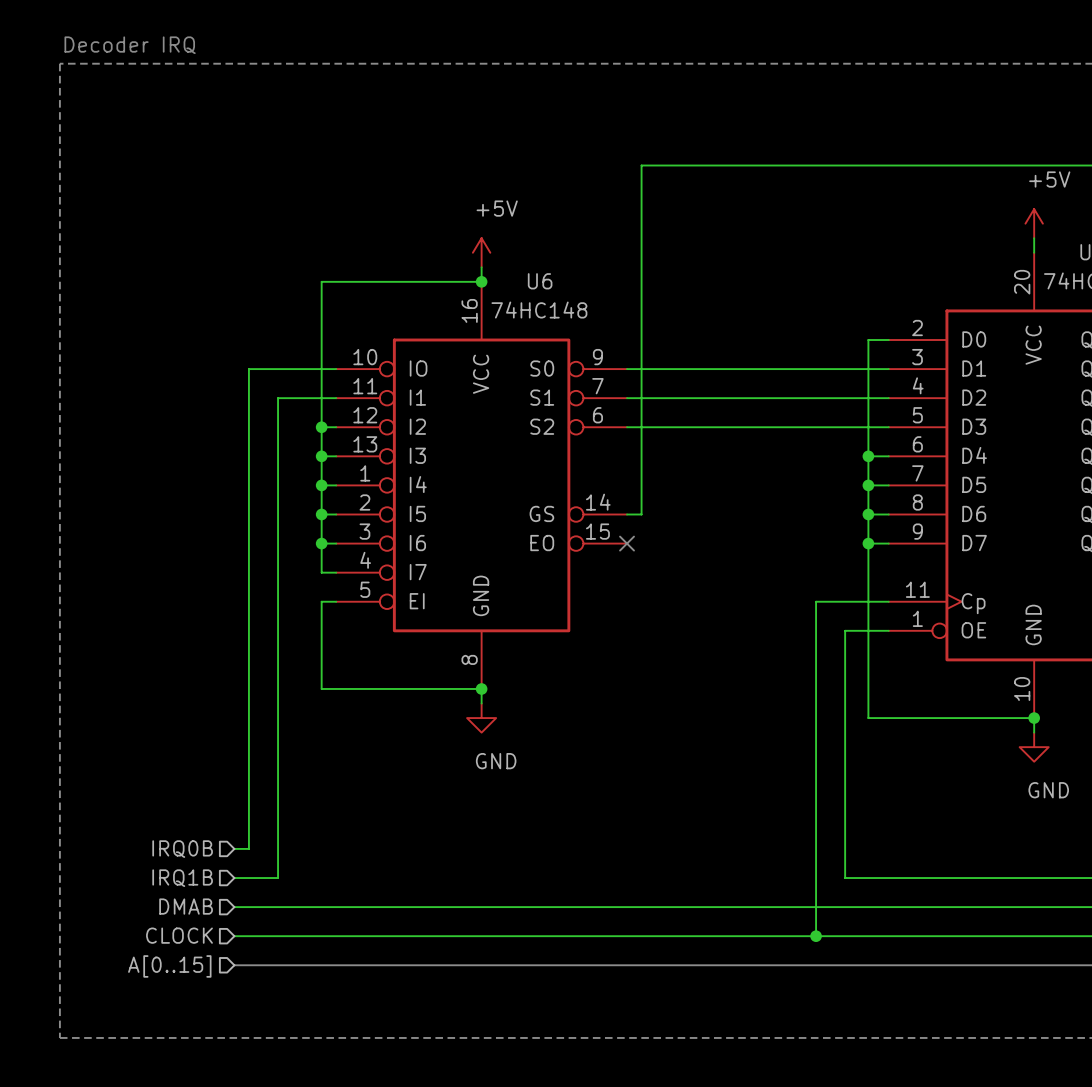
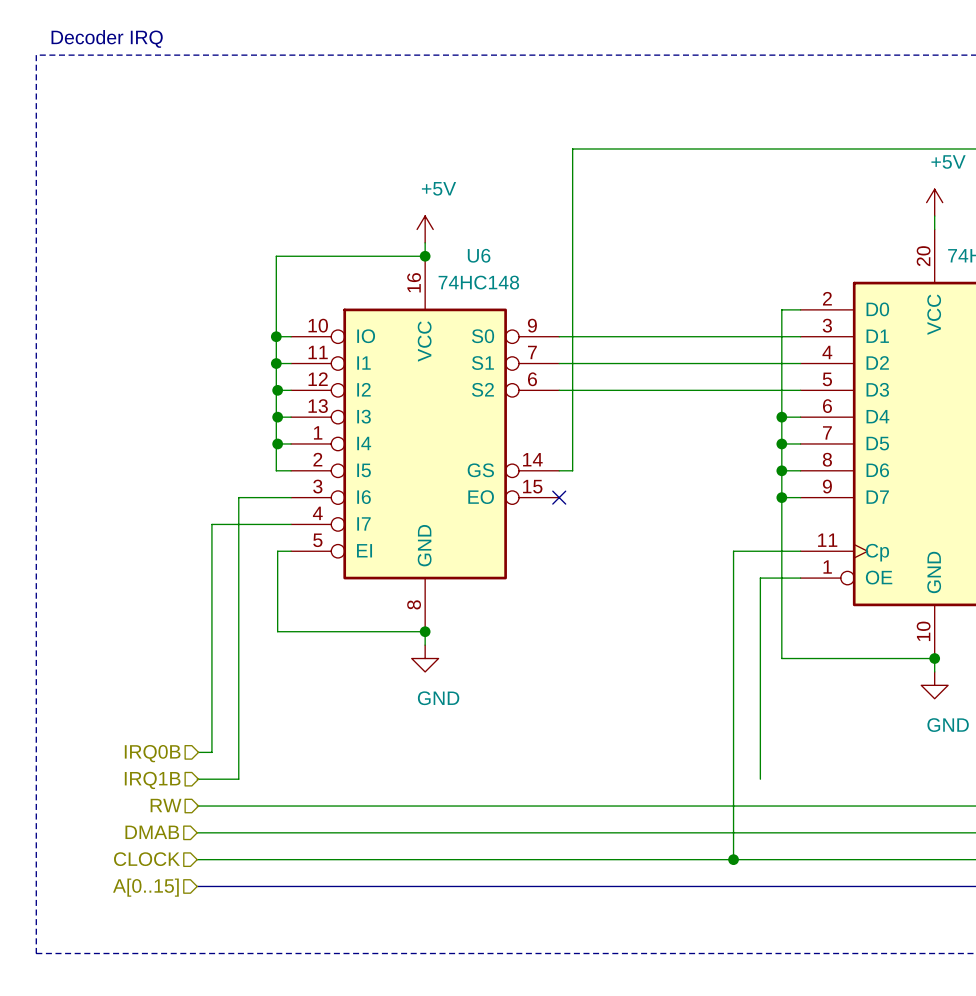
wire: (321, 281) (321, 572) -> (277, 256) (277, 470)
wire: (320, 369) (248, 369) (248, 848) -> (277, 497) (238, 497) (238, 779) (210, 779)
junction: none -> (276, 336)
wire: (320, 398) (278, 398) (278, 878) -> none
junction: none -> (276, 363)
junction: (321, 514) -> none
junction: (321, 543) -> none
wire: none -> (277, 524) (211, 524) (211, 752) (198, 752)
wire: (845, 848) (845, 878) -> (237, 806) (760, 806)
hierarchical label position: IRQ0B (182, 849) -> IRQ0B (152, 753)
hierarchical label: none -> RW (166, 805)
hierarchical label position: IRQ1B (182, 878) -> IRQ1B (152, 780)

